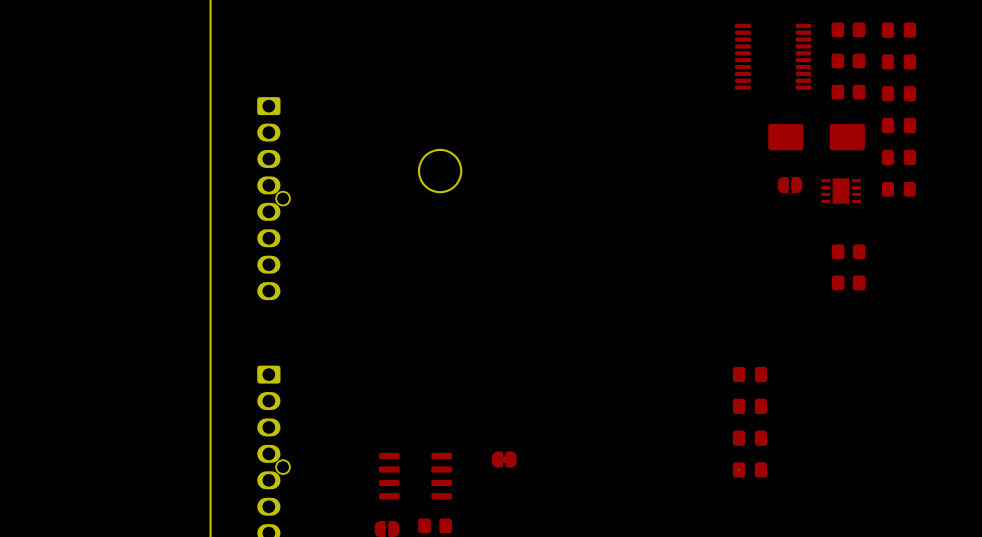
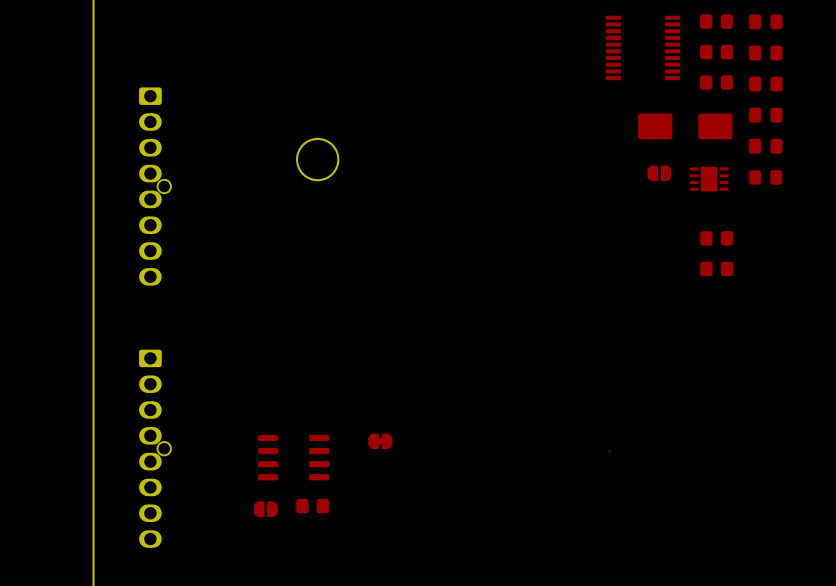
part: (750, 374) -> none
part: (750, 406) -> none
part: (750, 438) -> none
part: (750, 469) -> none

